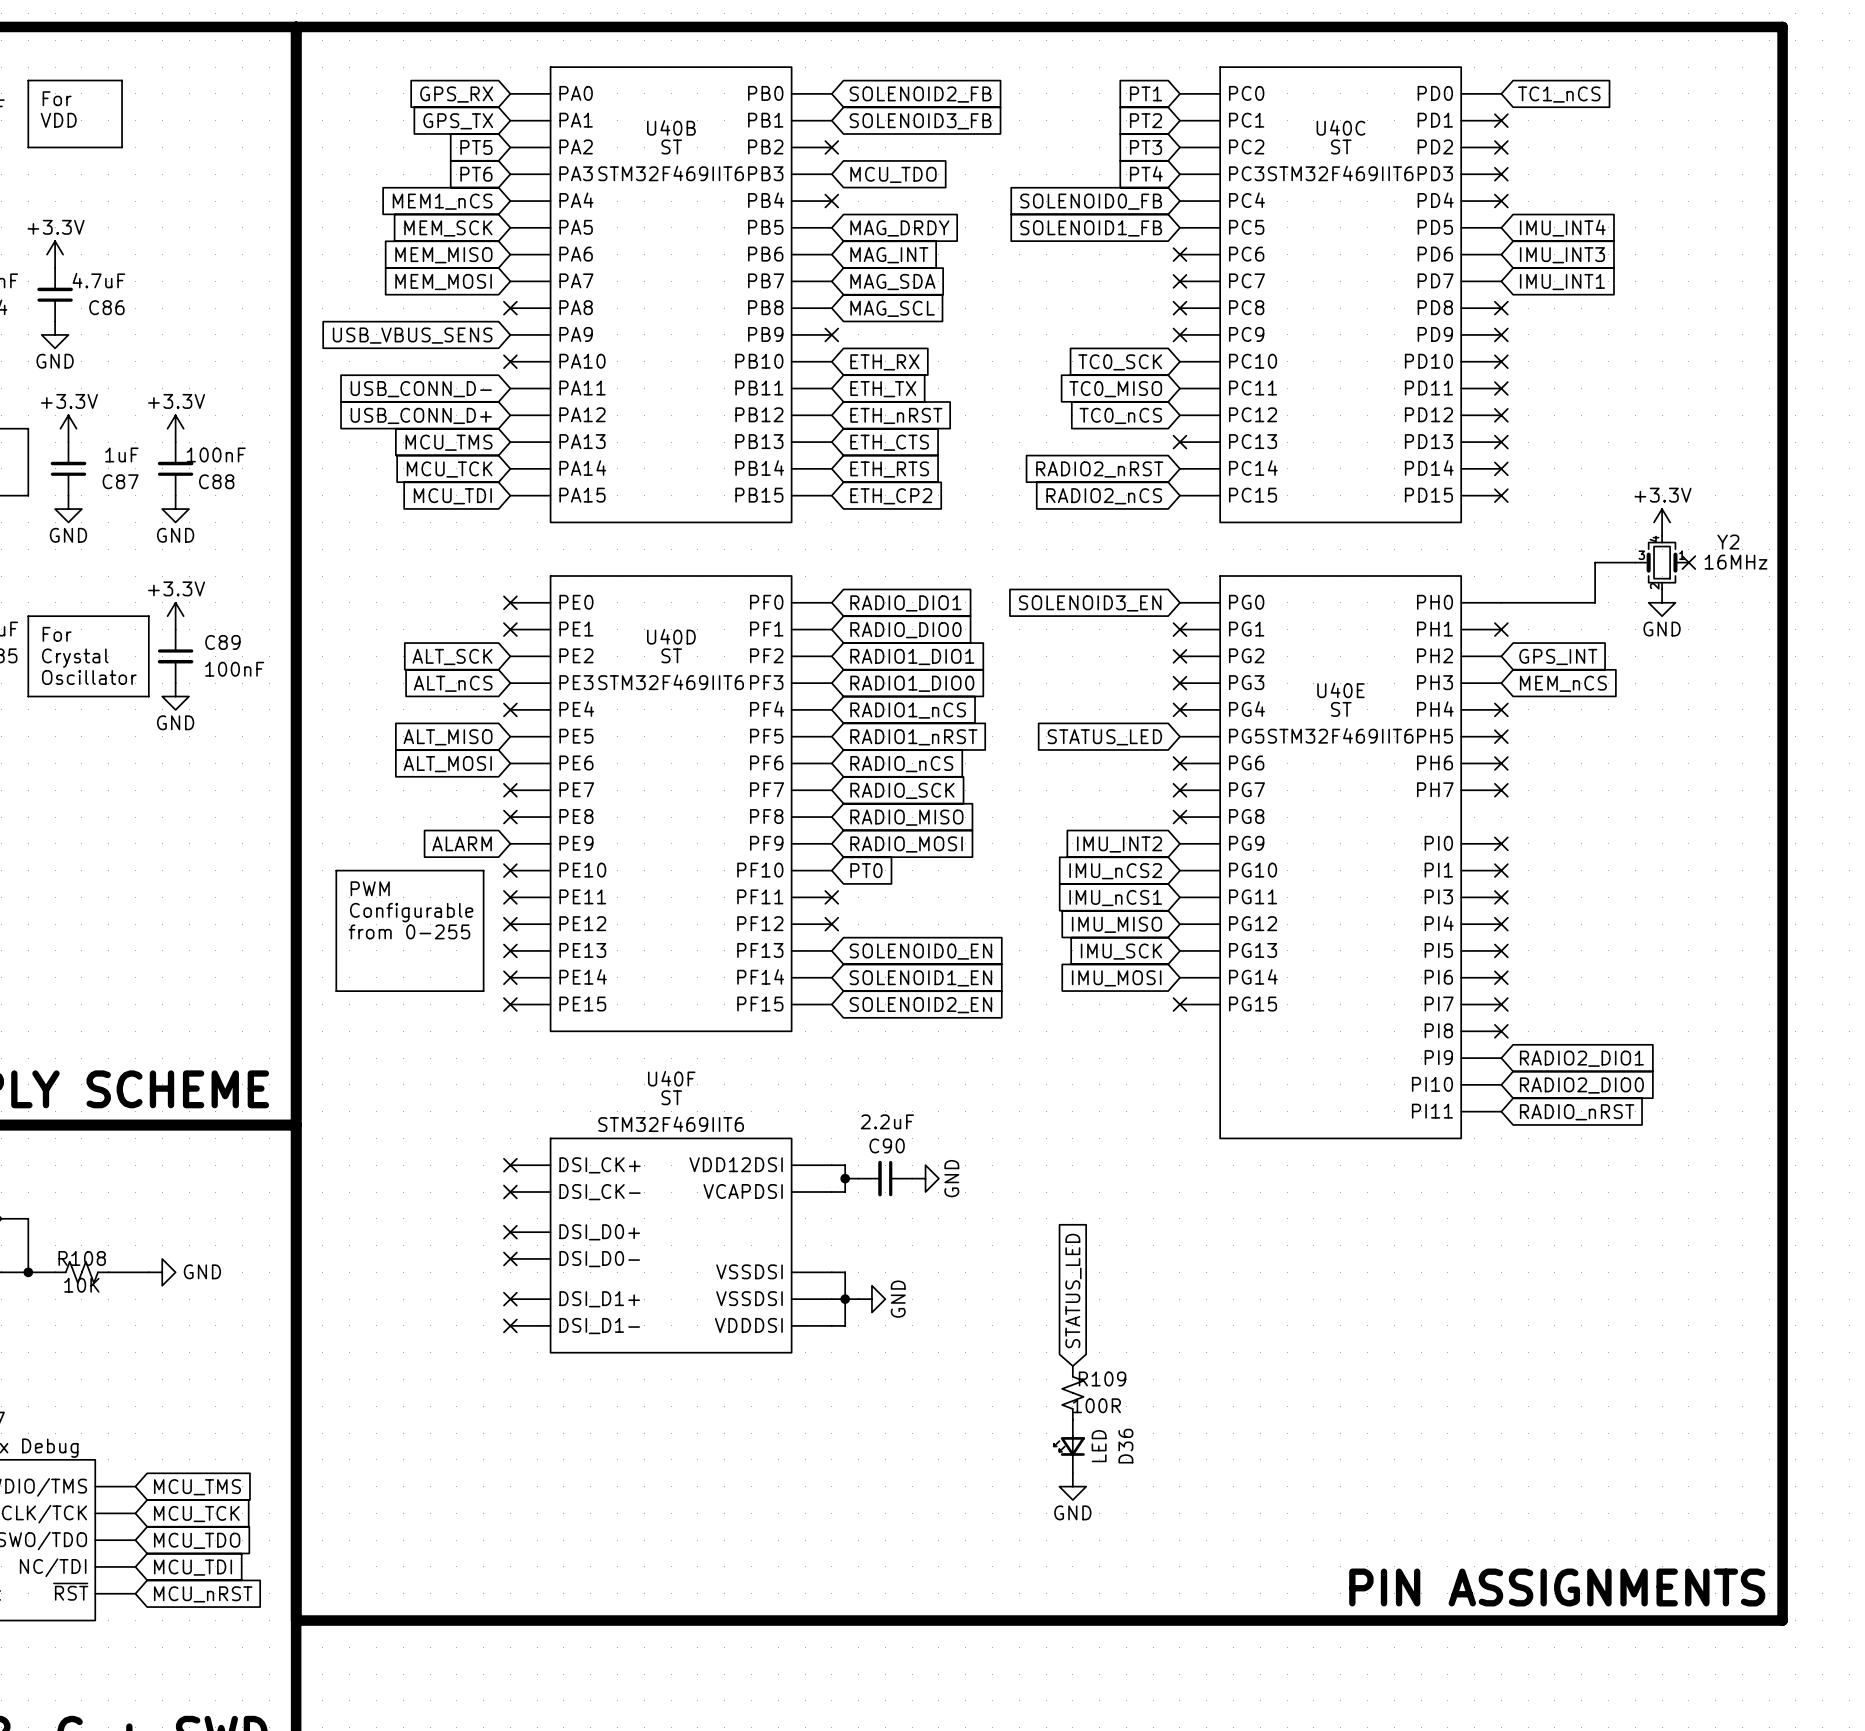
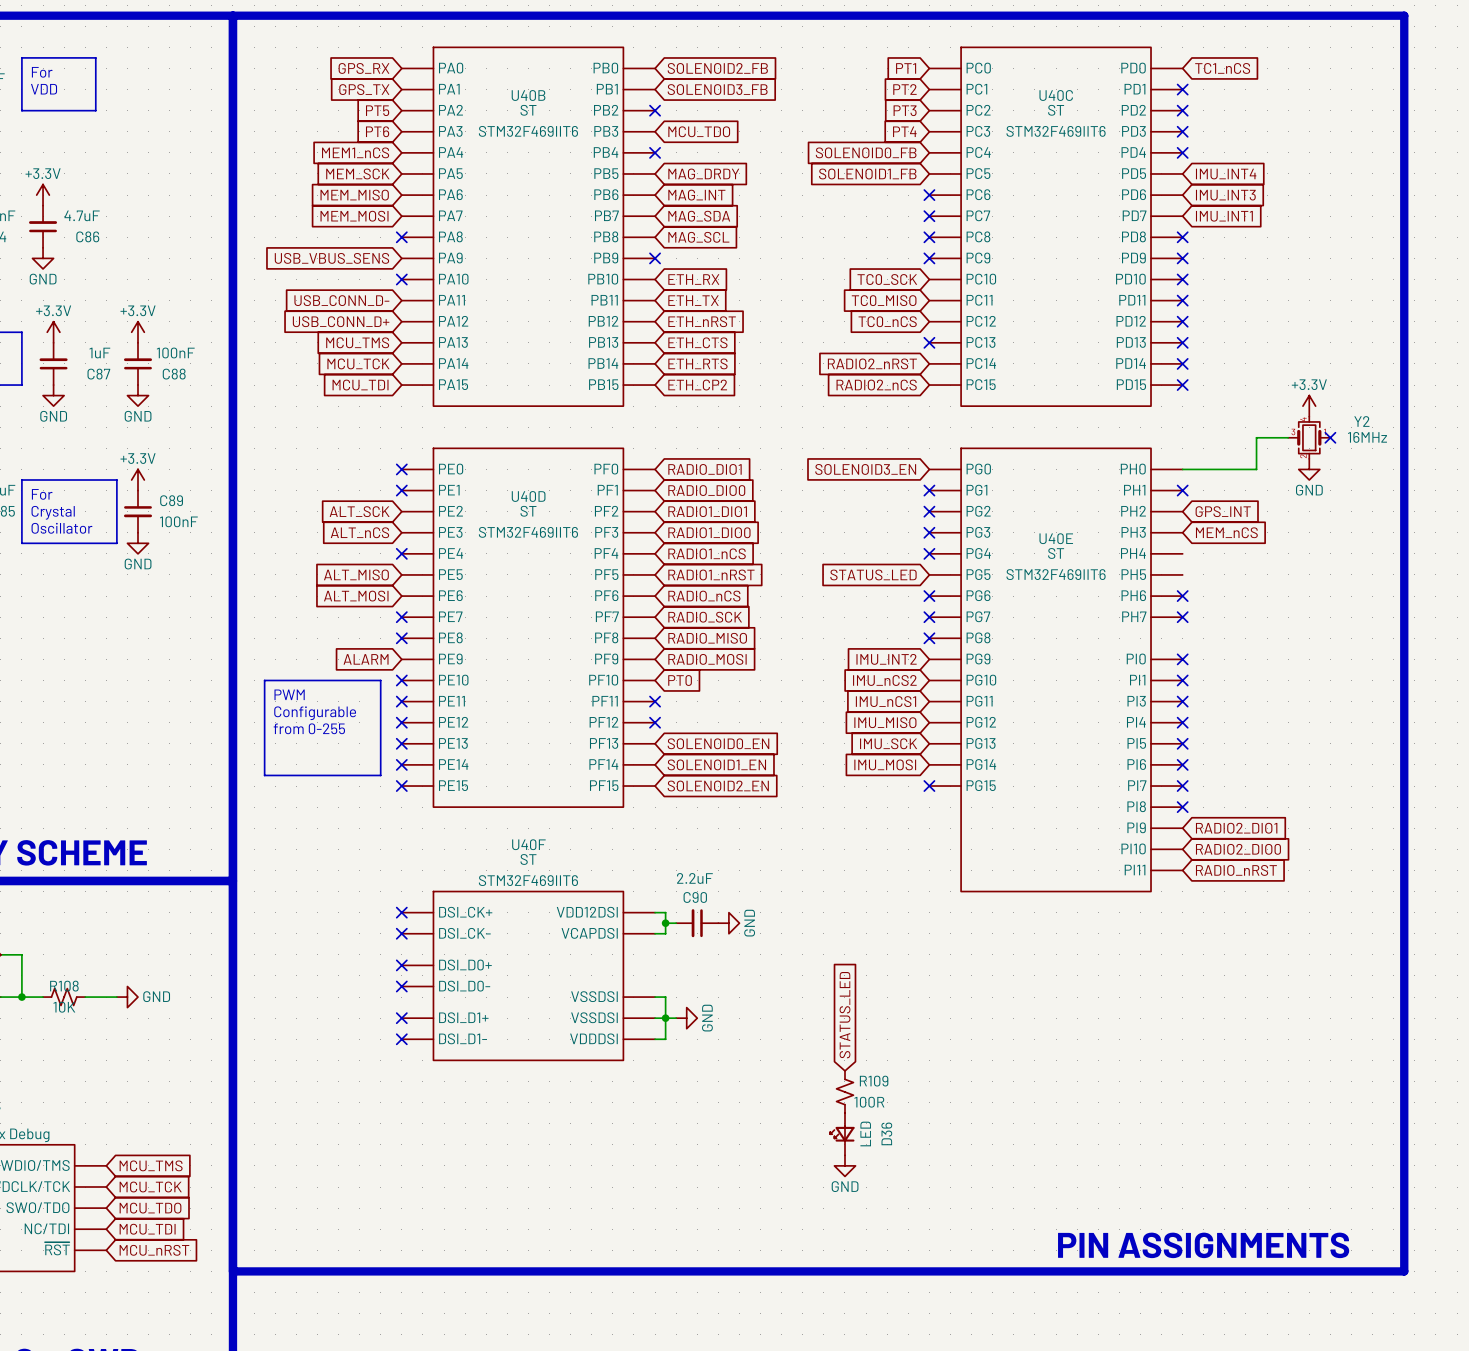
no-connect mark: (1501, 709) -> none
no-connect mark: (1501, 736) -> none

